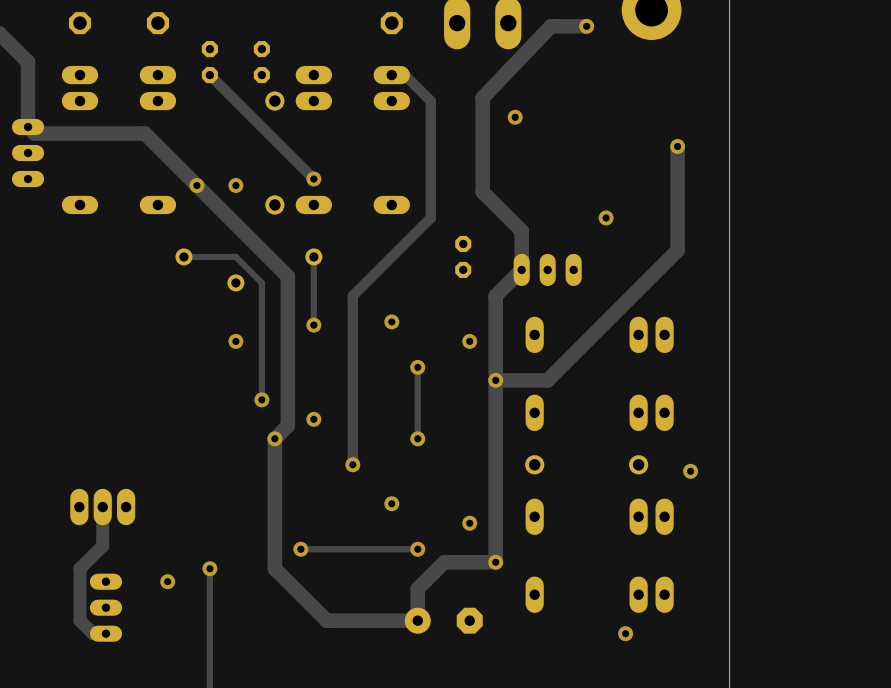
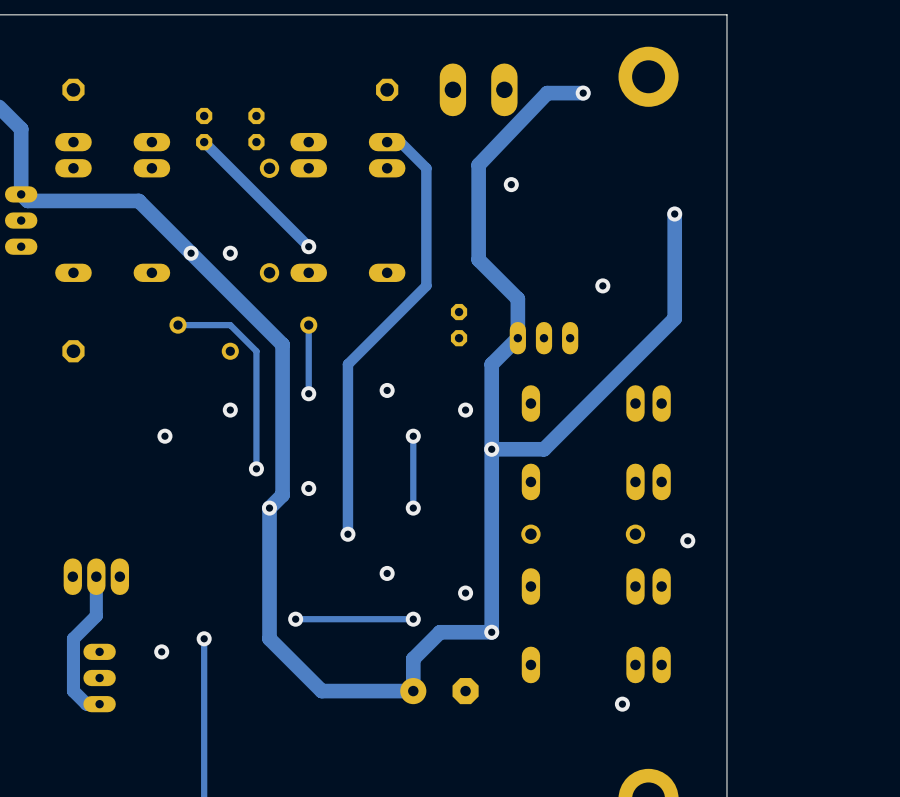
part: (157, 23) -> none
part: none -> (73, 351)
via: none -> (164, 436)

